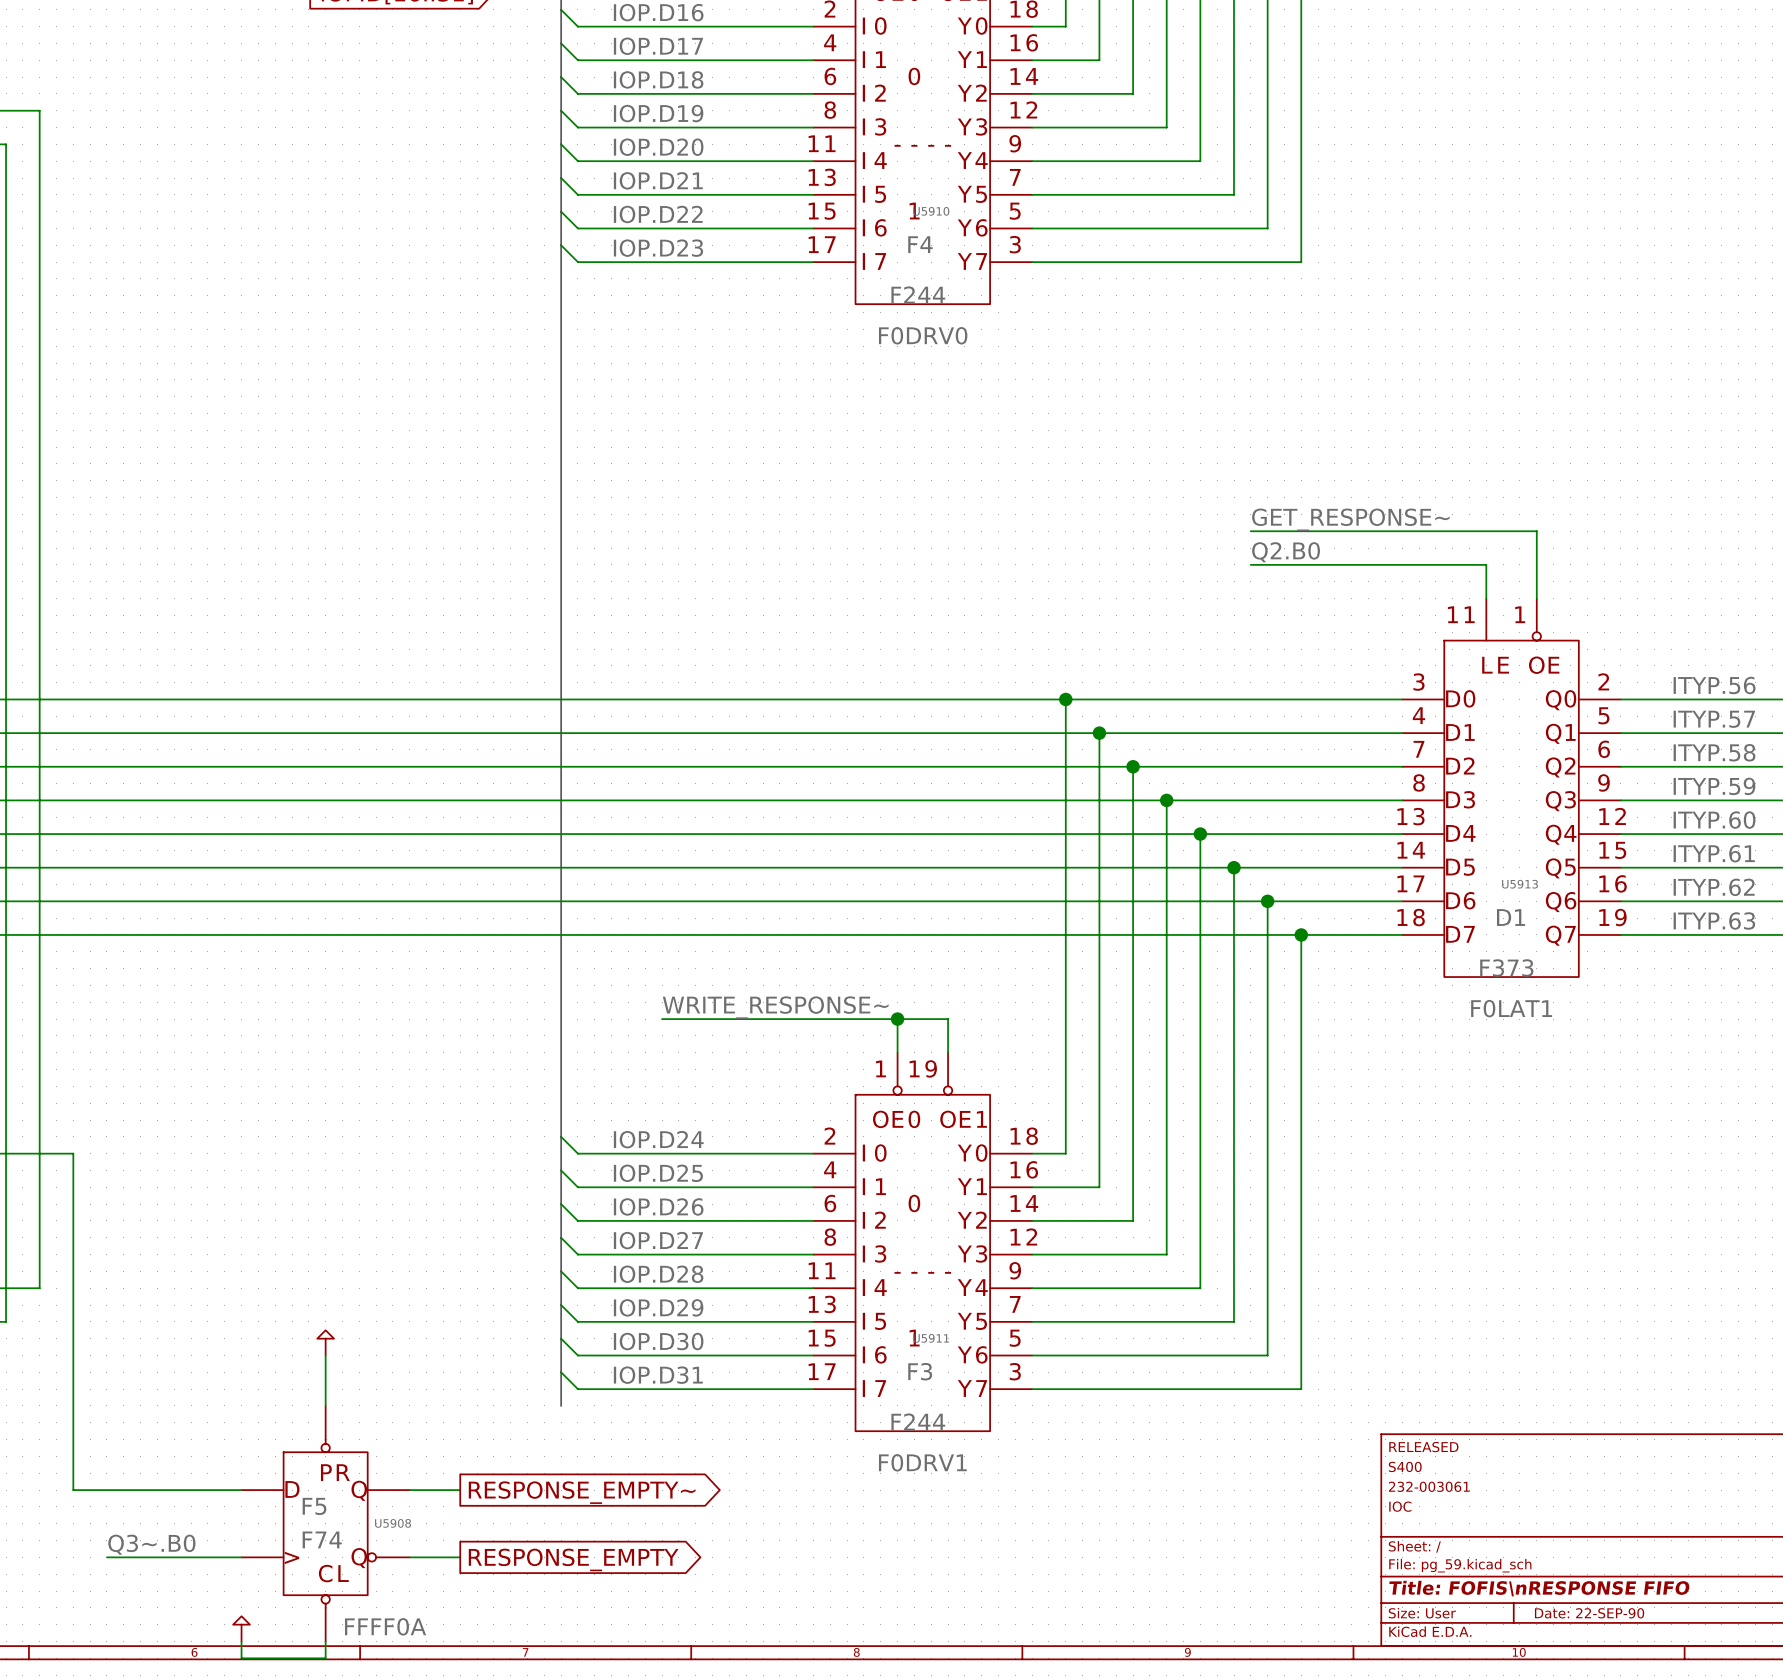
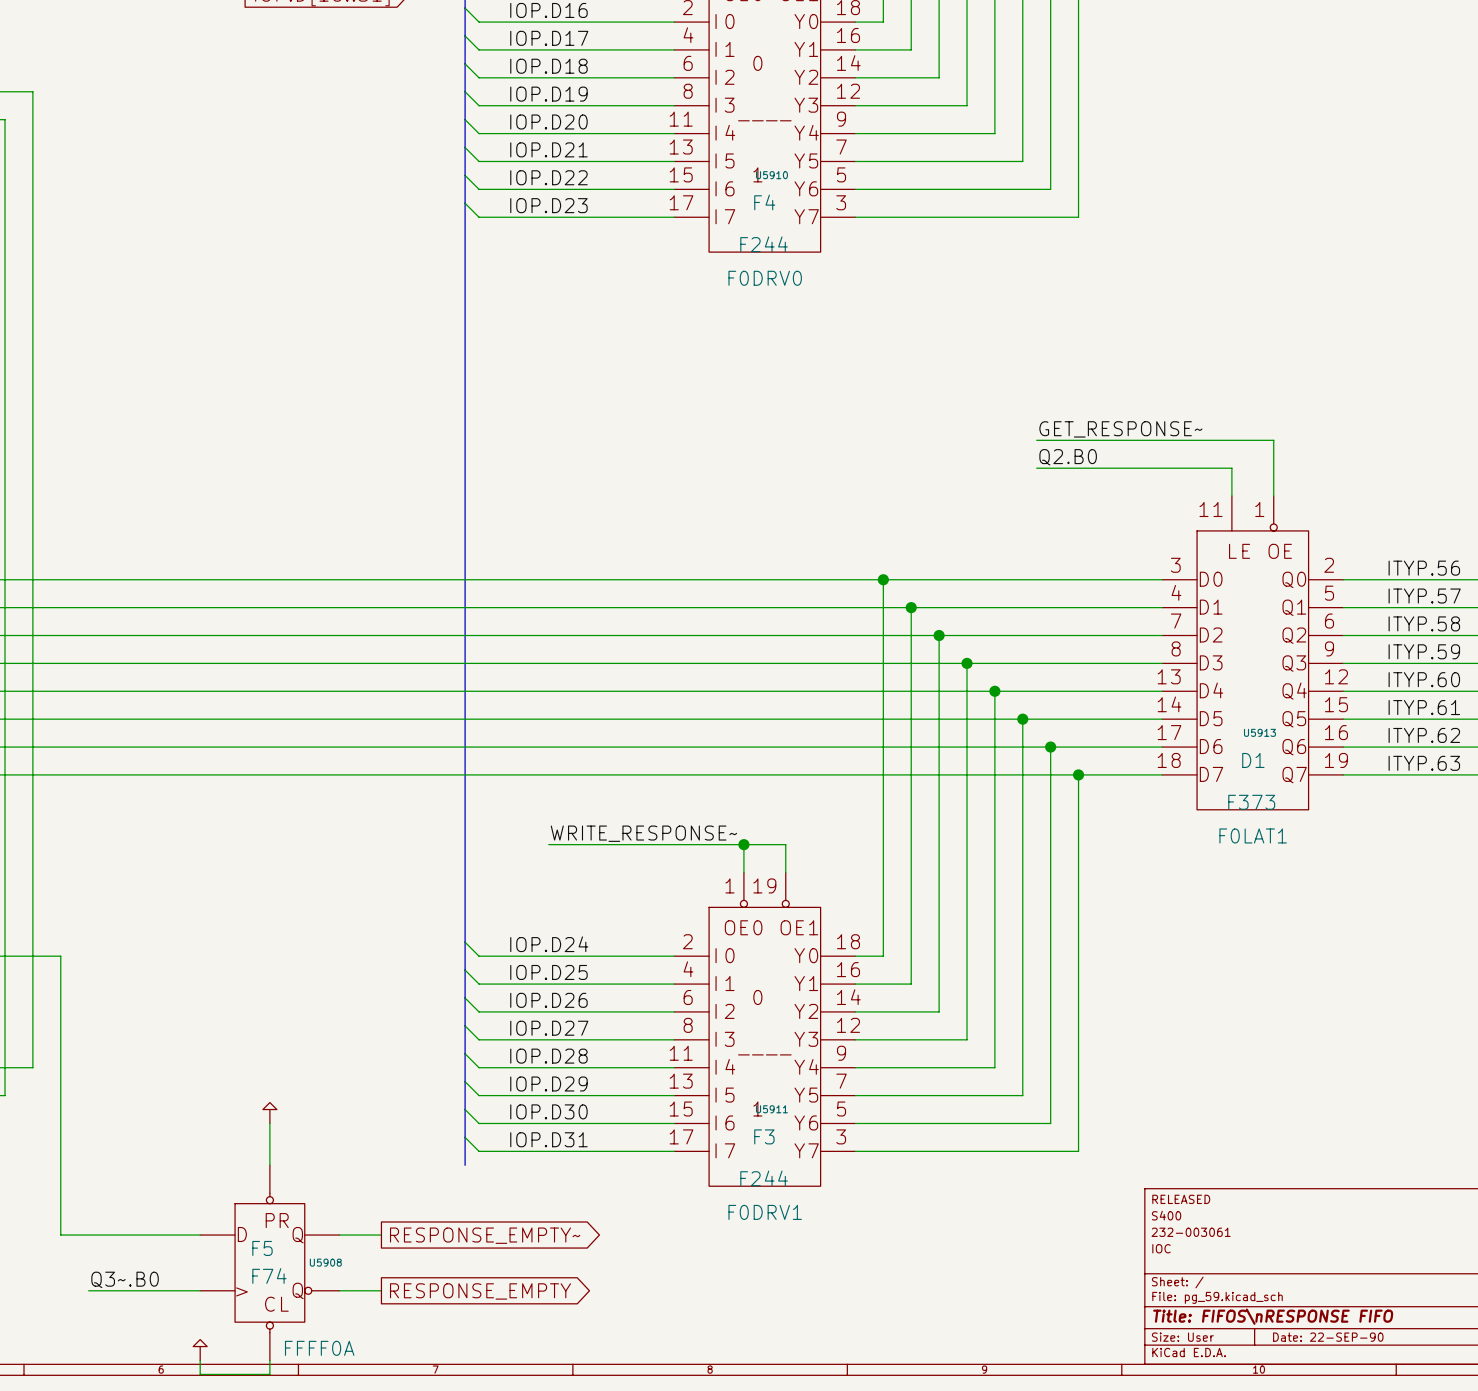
title block: Title: FOFIS\nRESPONSE FIFO (1539, 1588) -> Title: FIFOS\nRESPONSE FIFO (1273, 1316)

